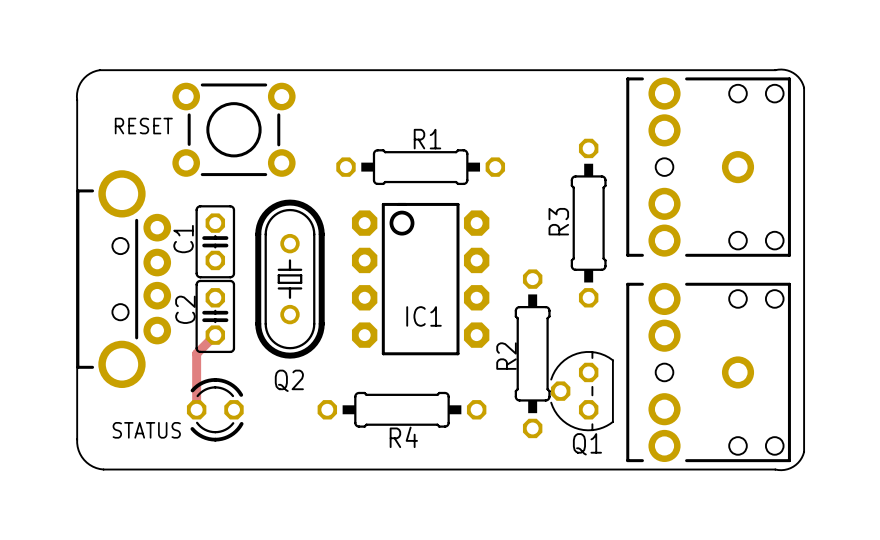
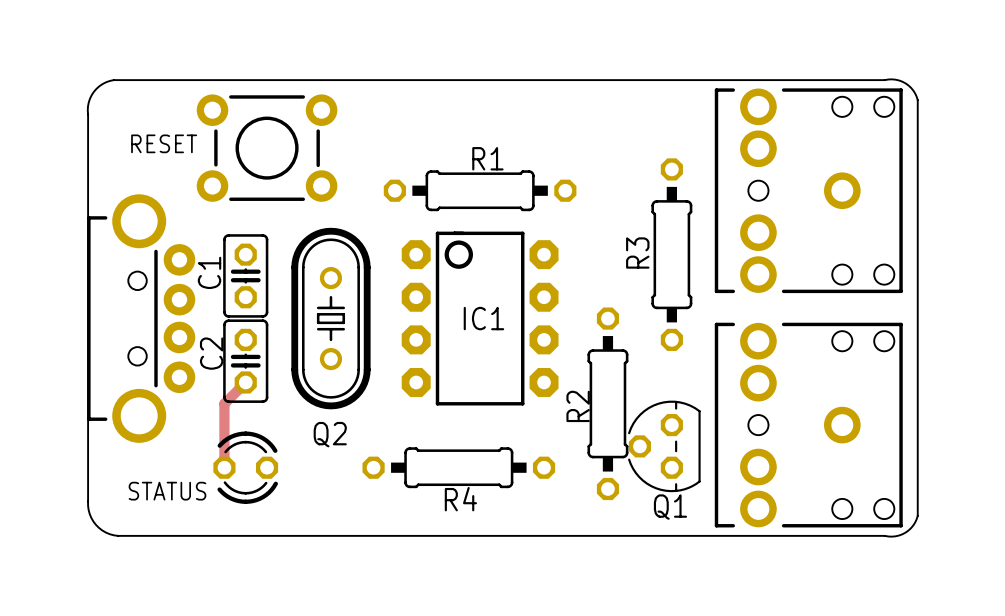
IC1 name position: IC1 (424, 316) -> IC1 (483, 318)

